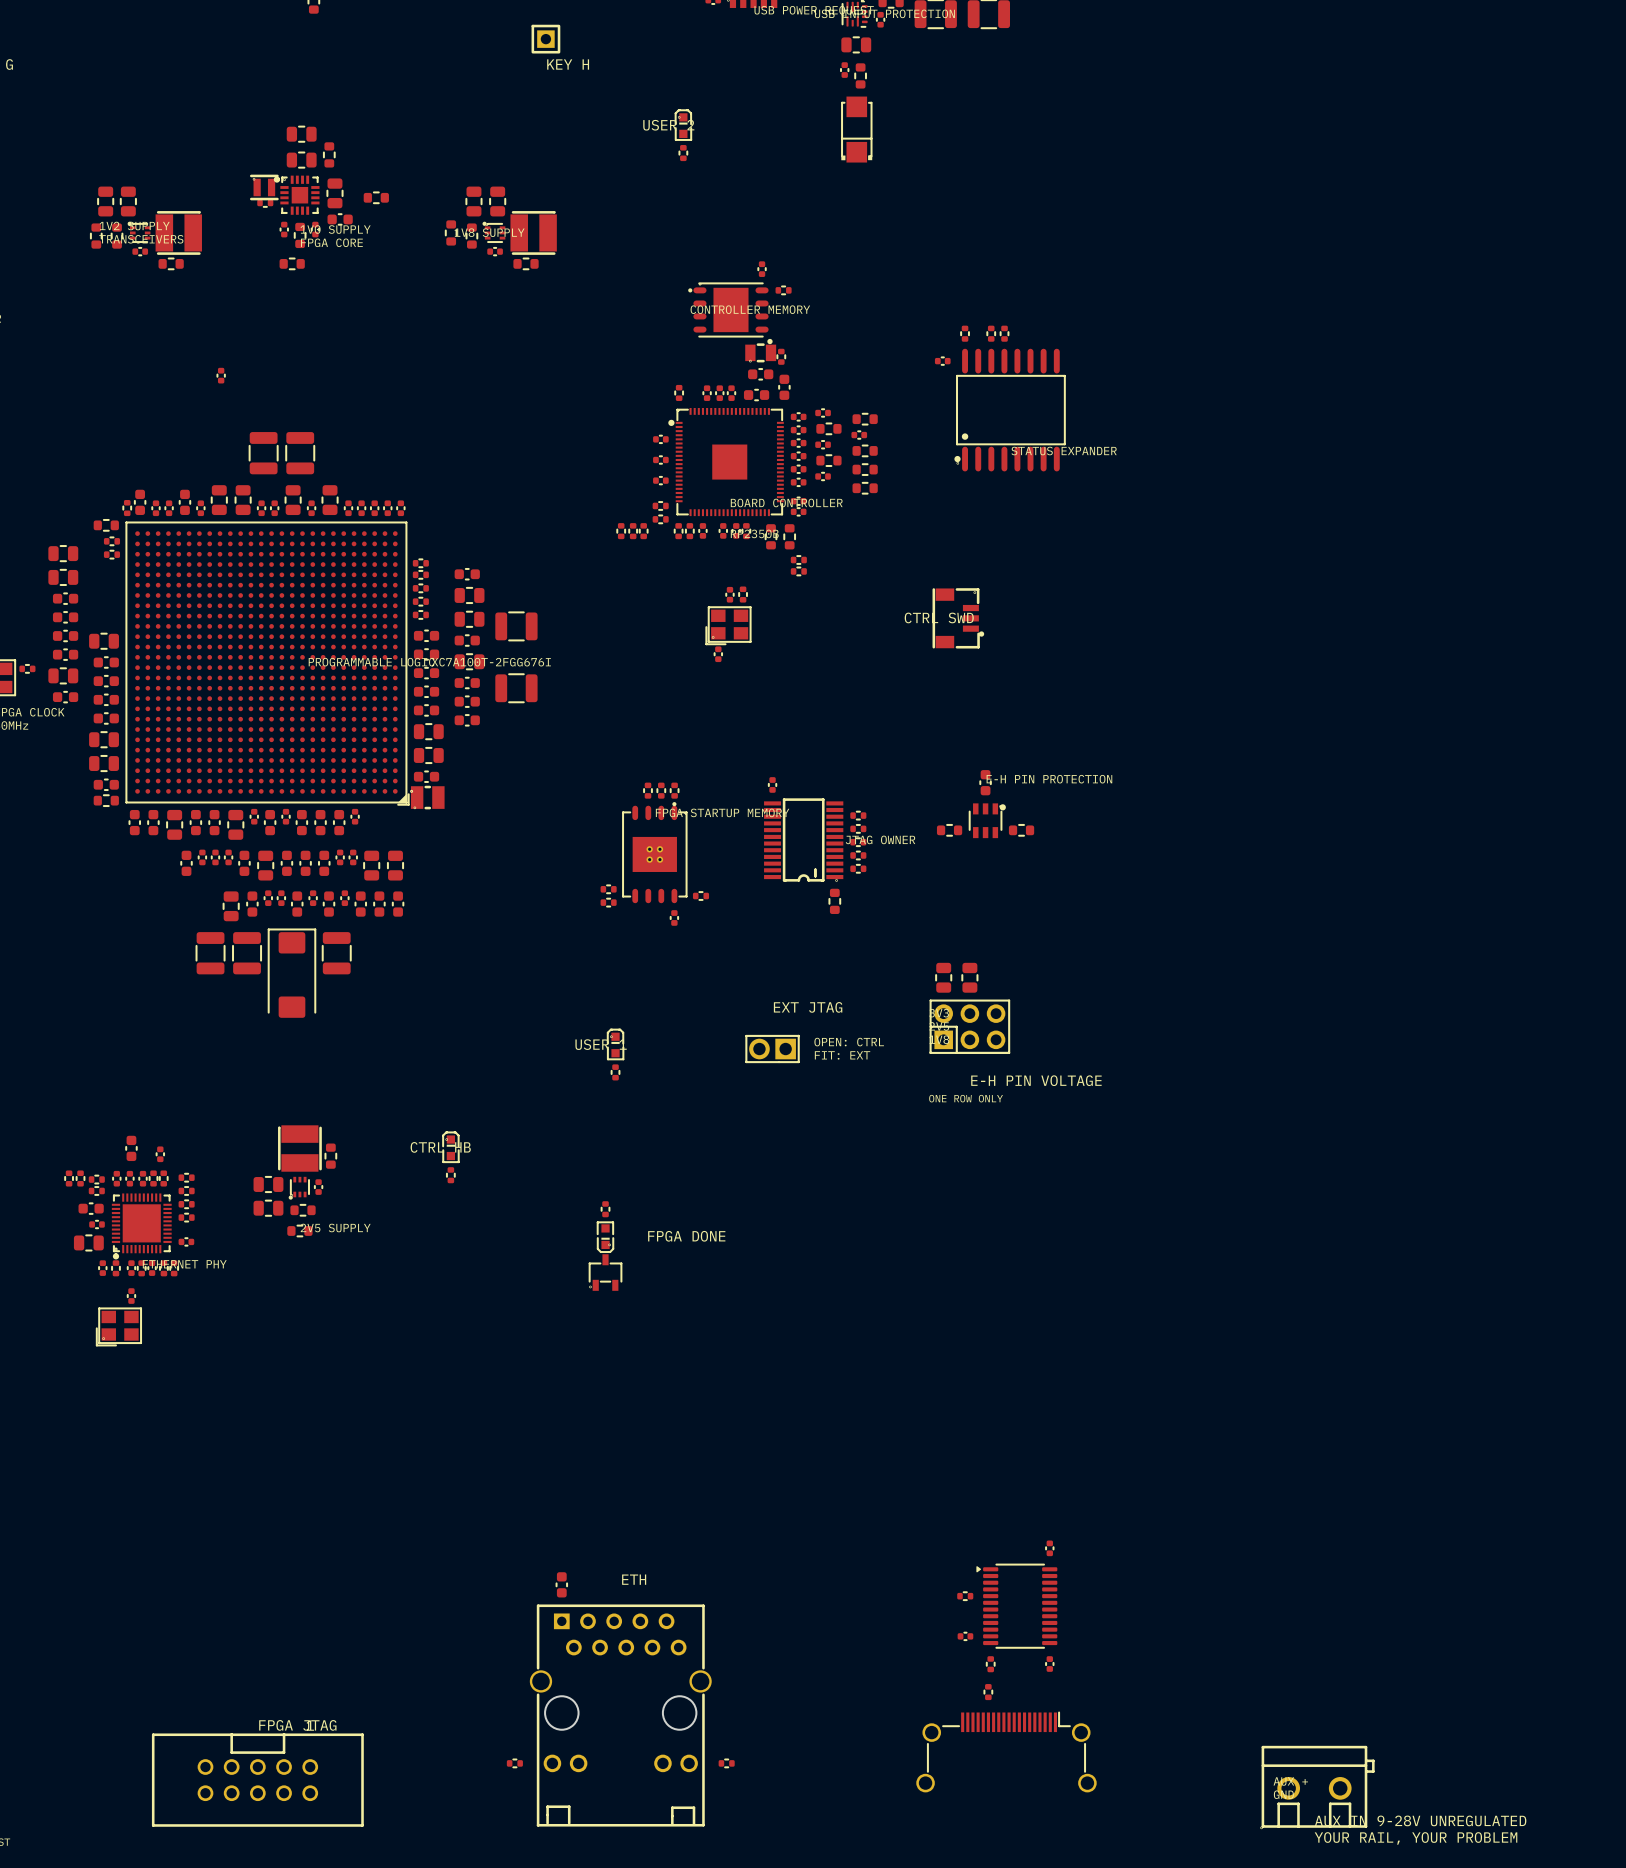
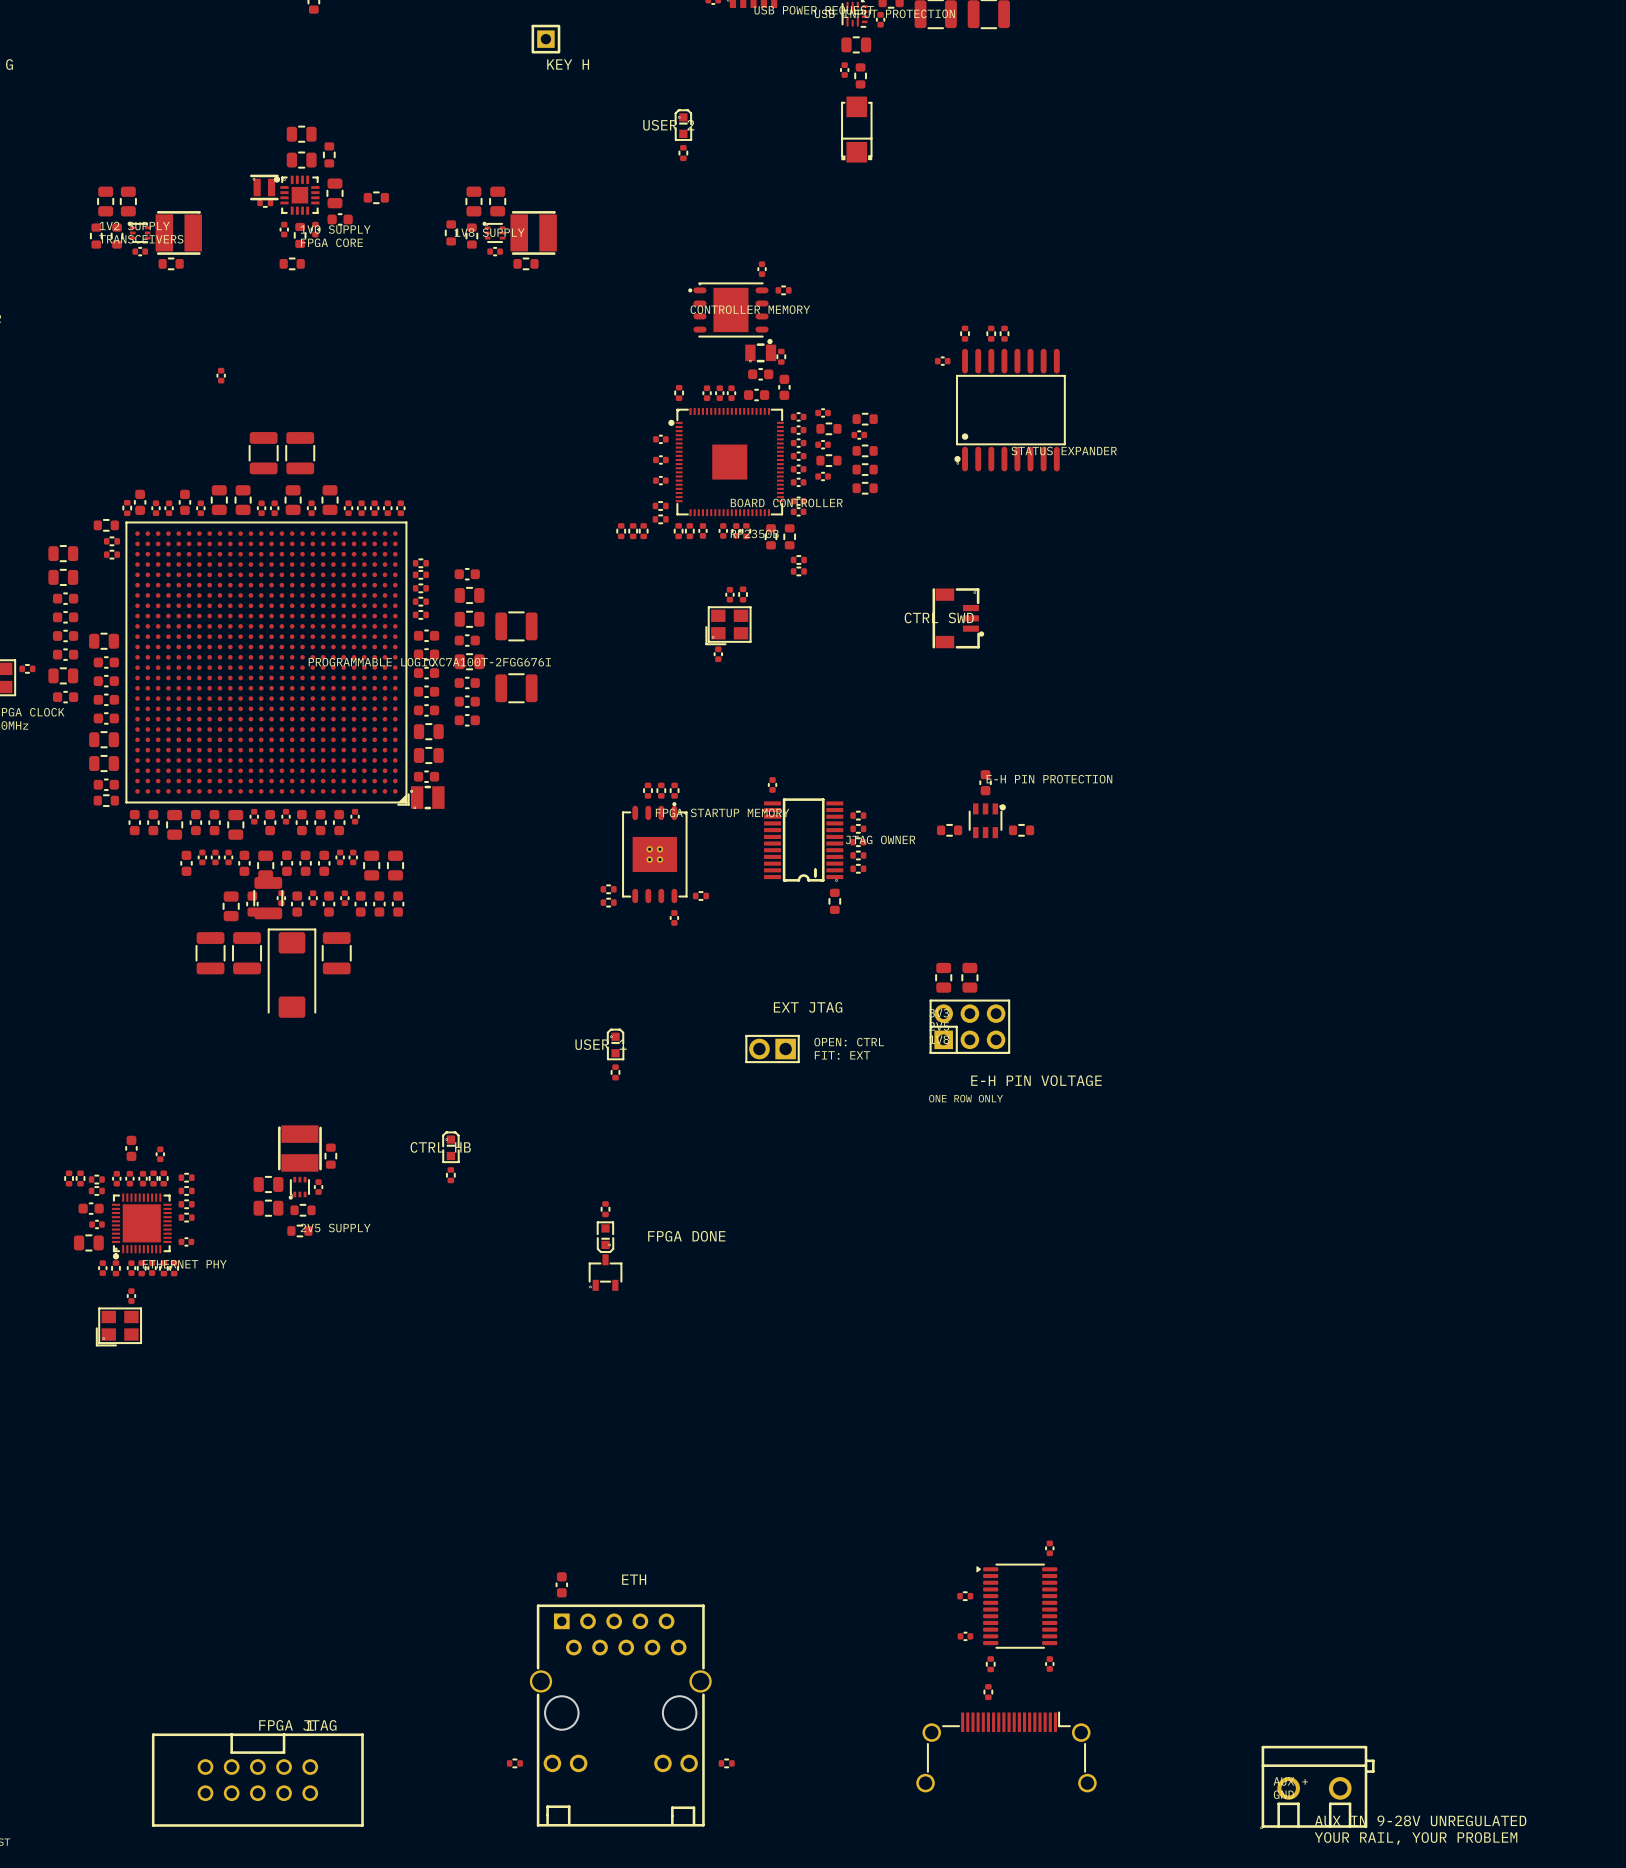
part footprint: [263, 890, 273, 907] -> [253, 877, 283, 920]

